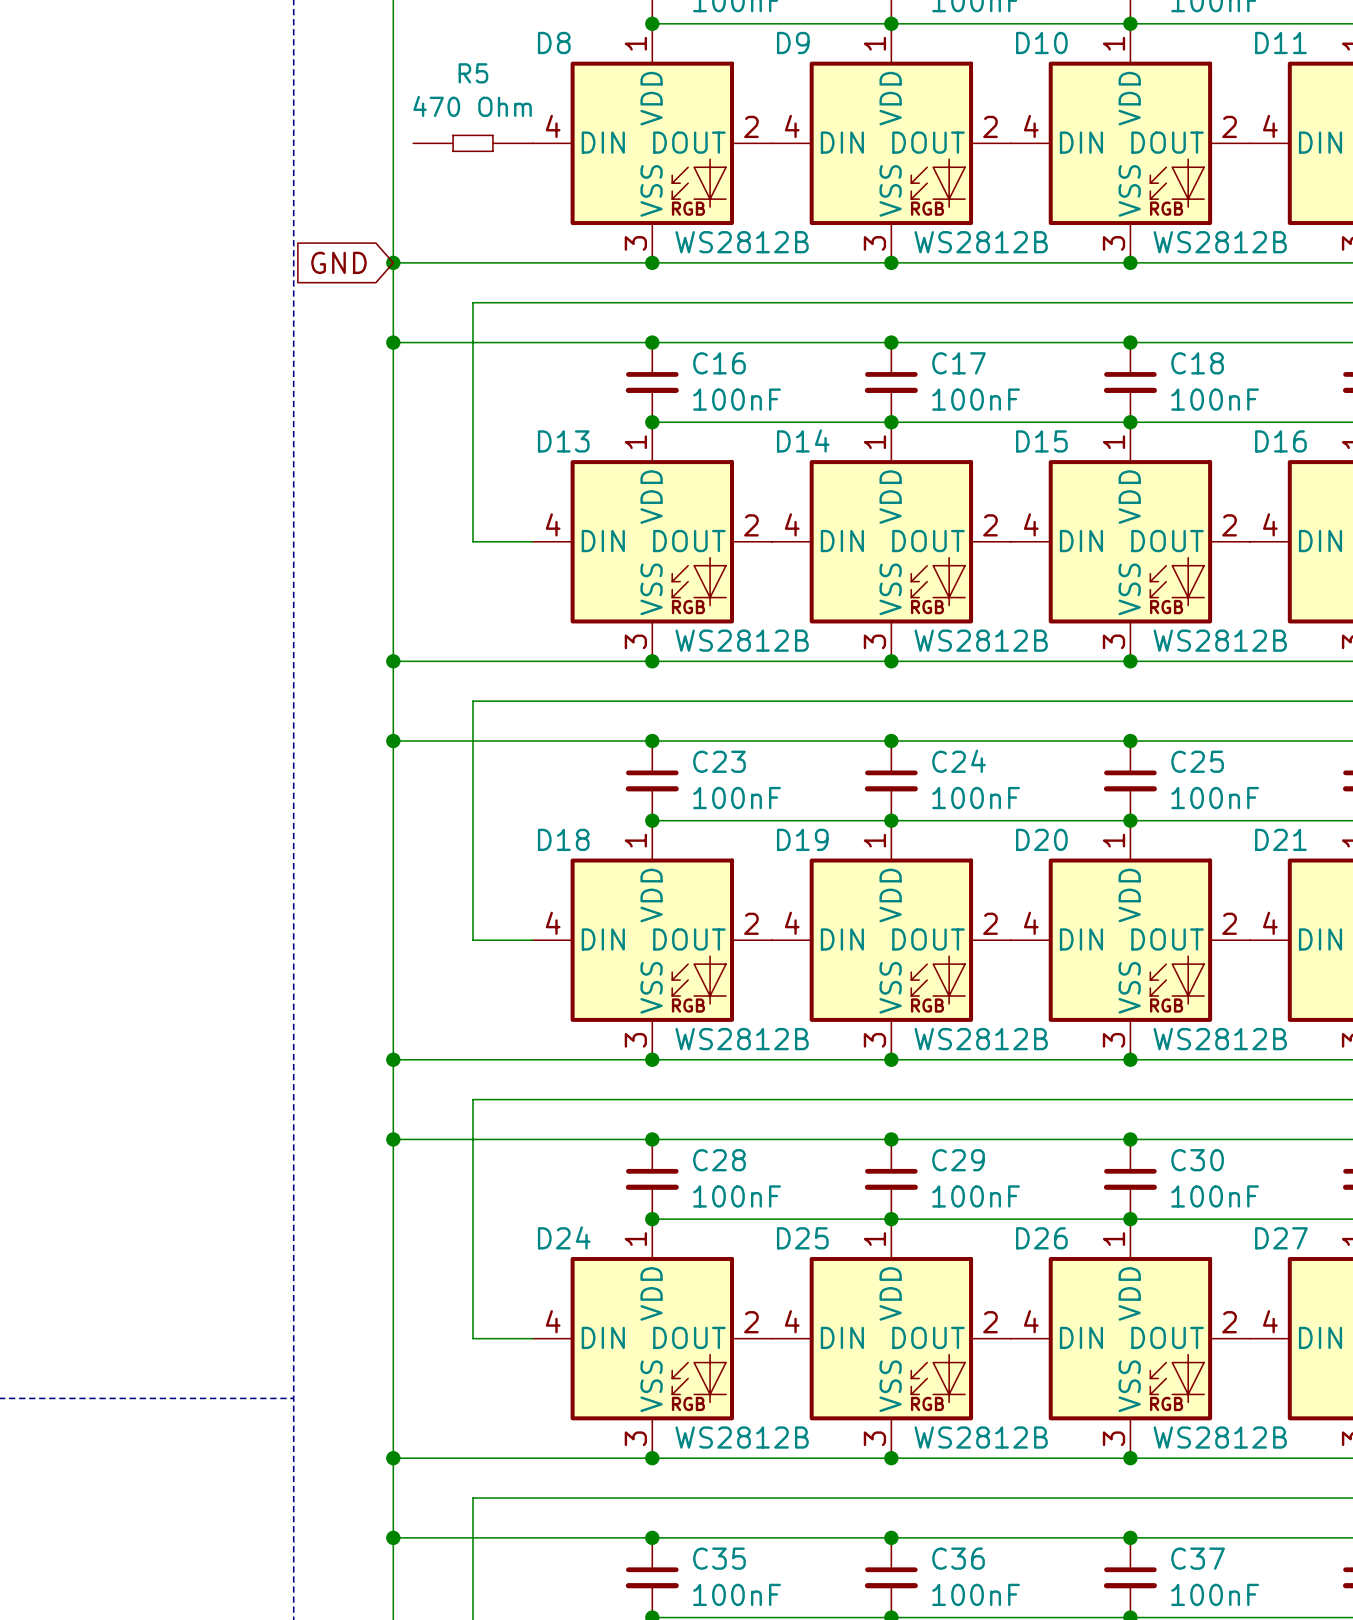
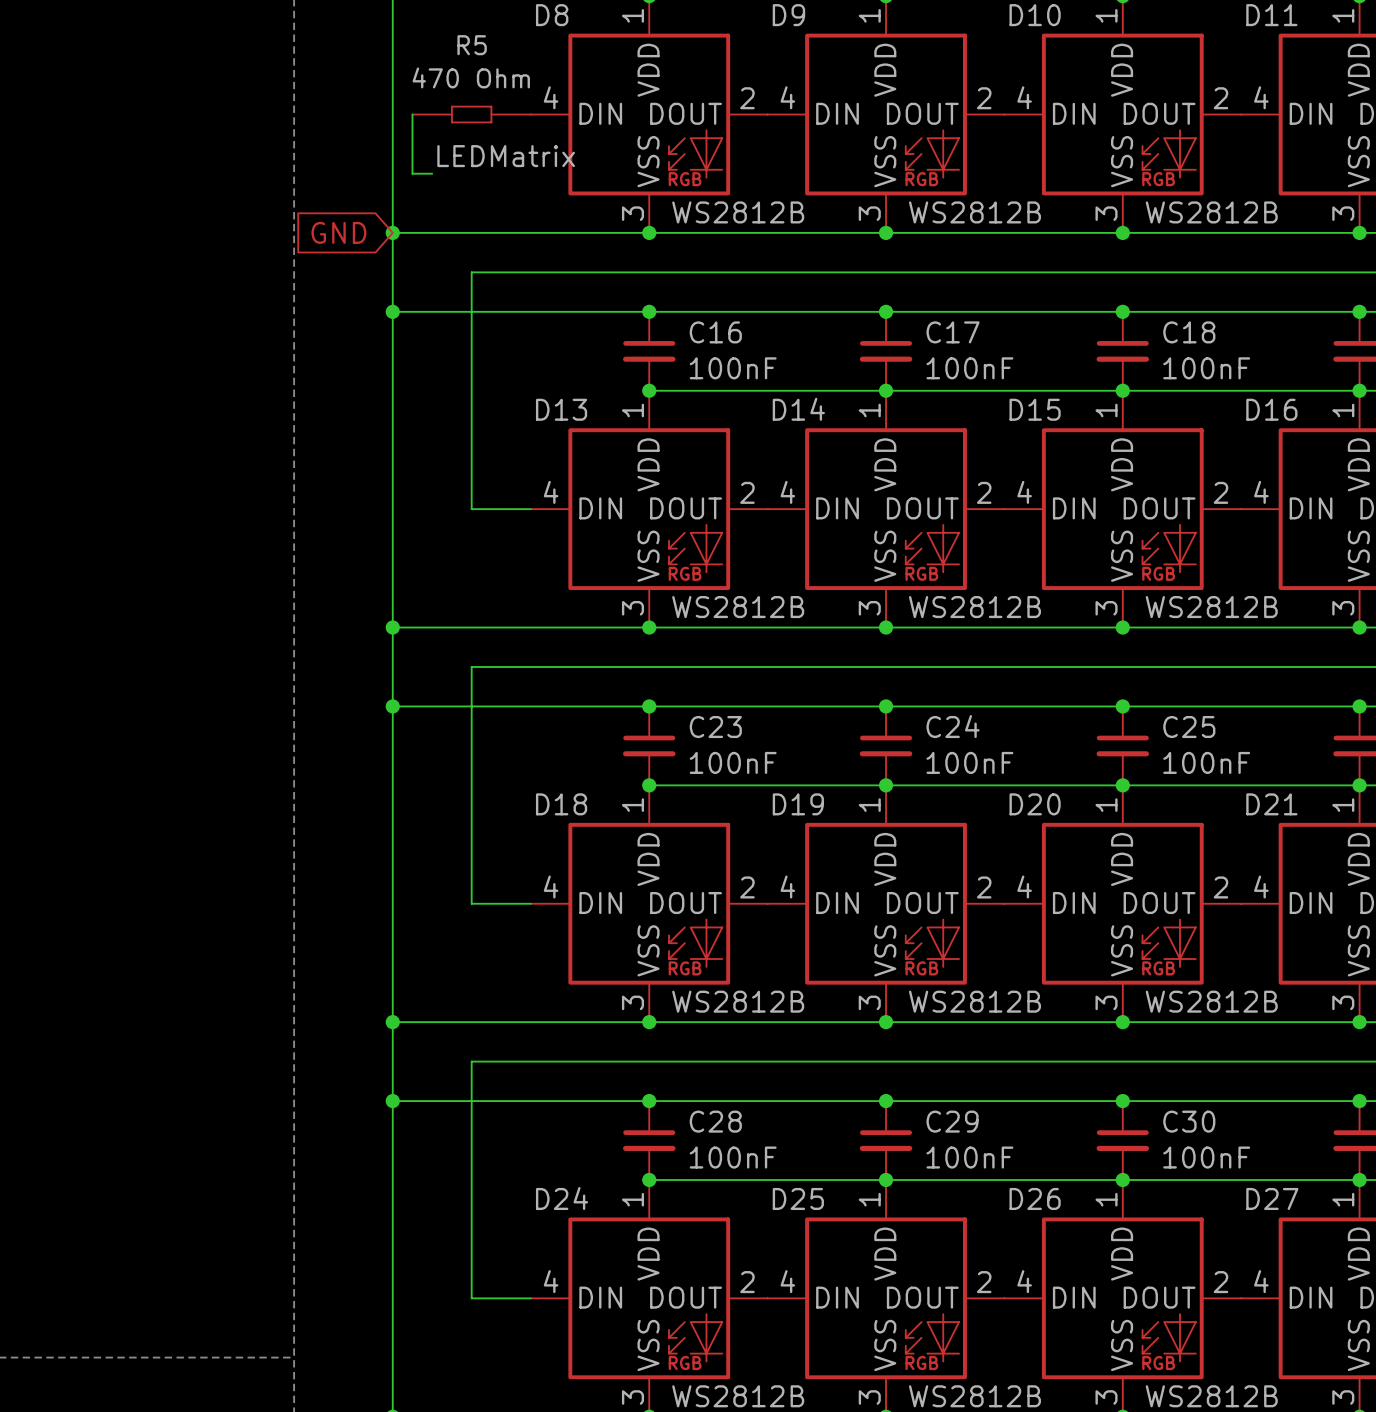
wire: none -> (412, 114) (412, 173) (432, 173)
label: none -> LEDMatrix (506, 156)

